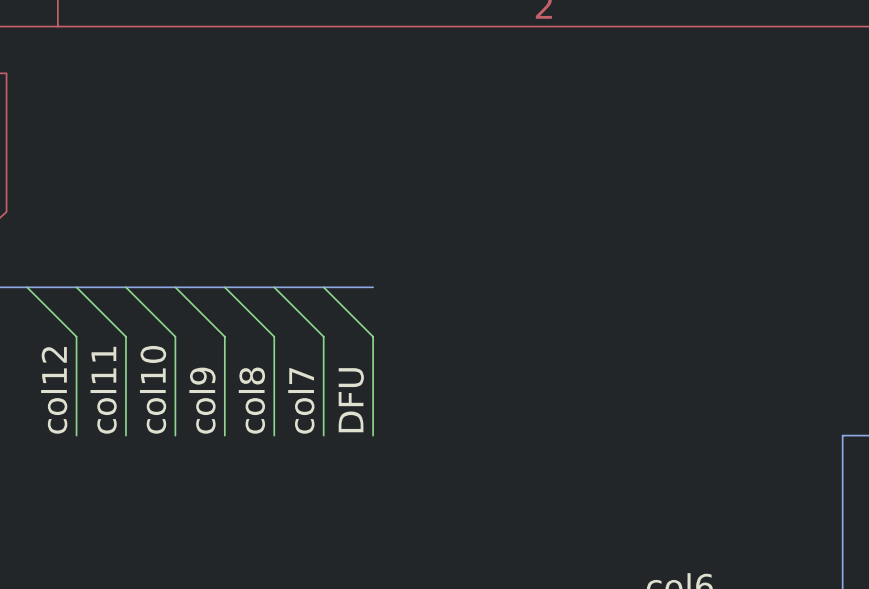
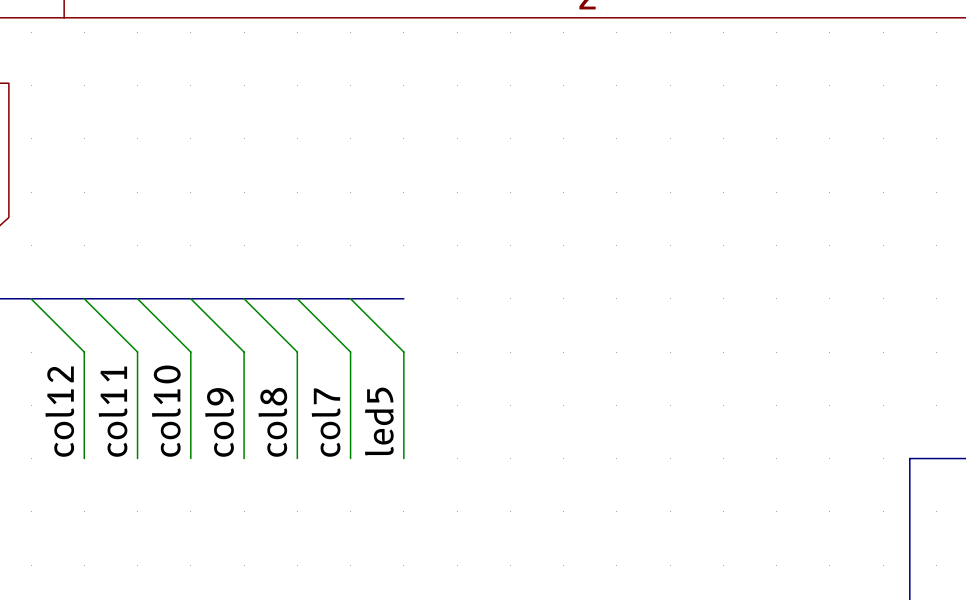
label: DFU (351, 400) -> led5 (379, 421)

